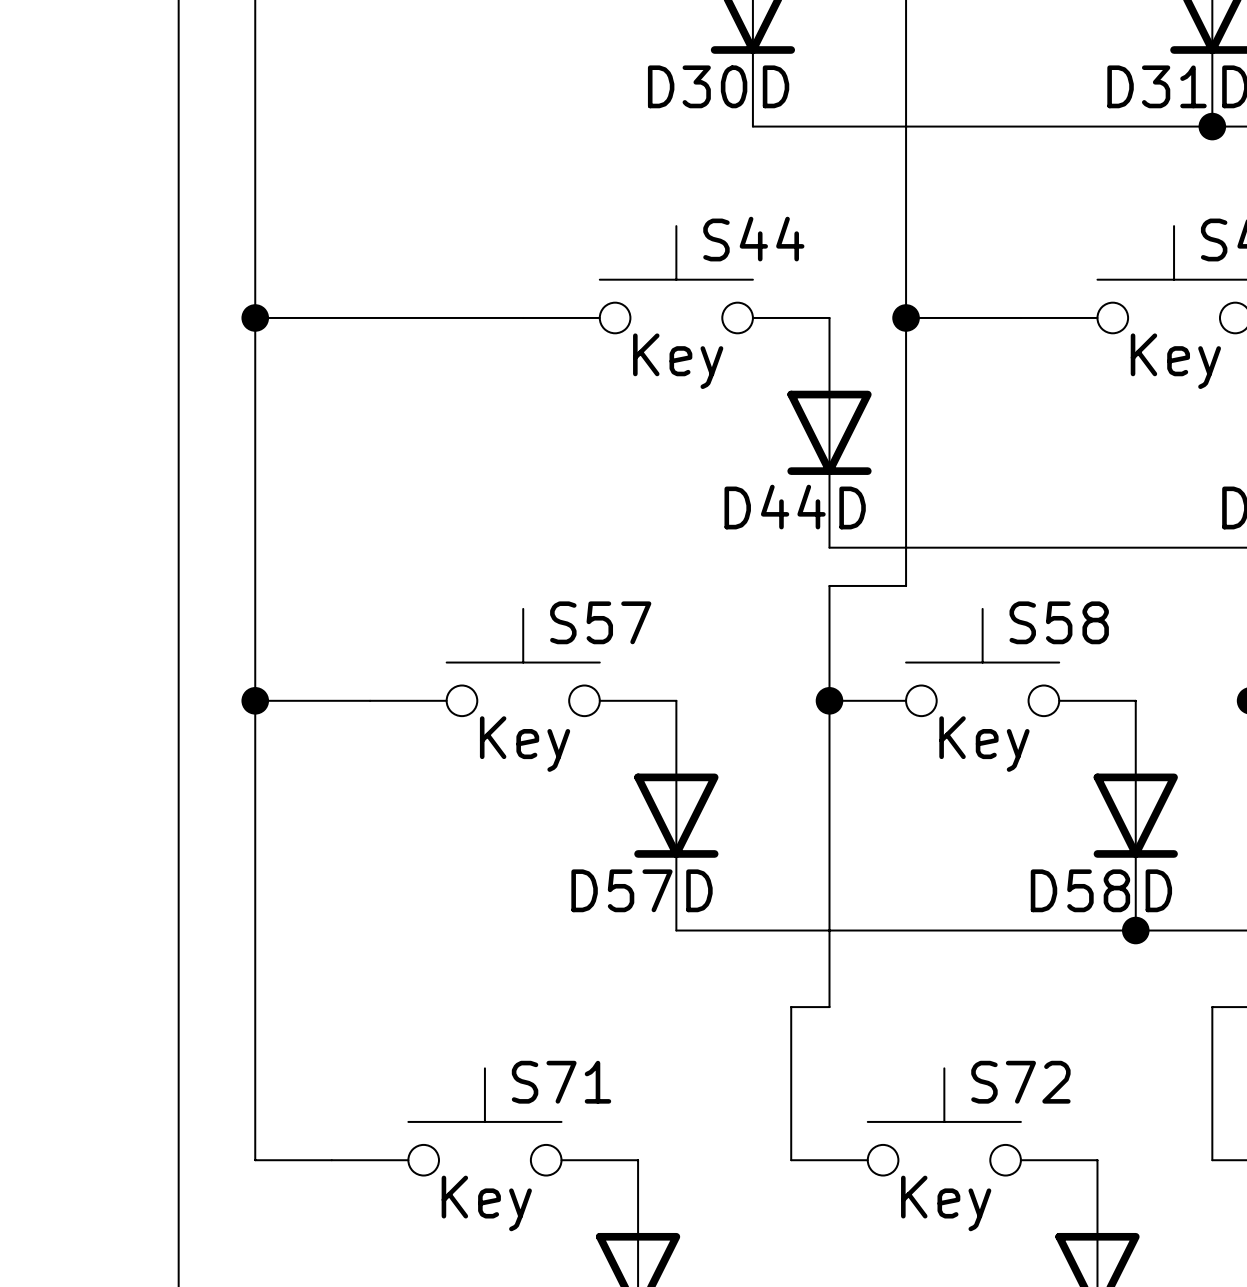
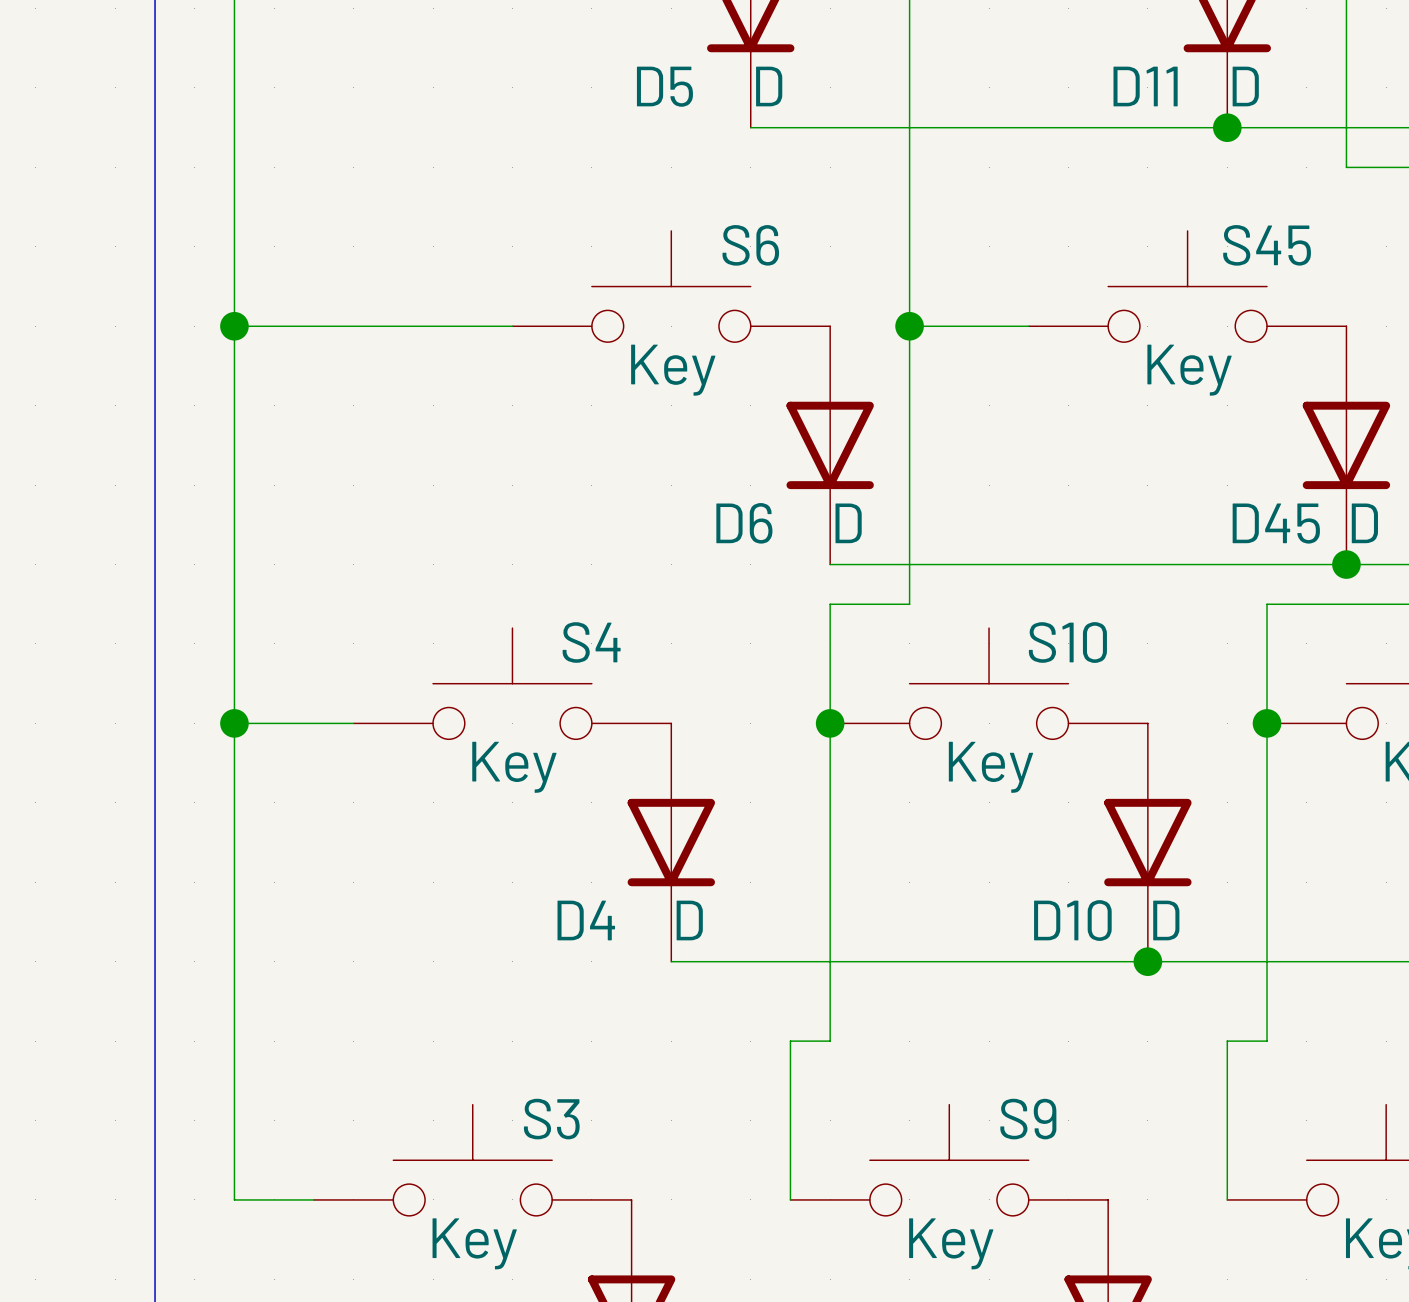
D30 name: D30 (697, 86) -> D5 (664, 86)
D31 name: D31 (1157, 86) -> D11 (1145, 86)
S44 name: S44 (753, 239) -> S6 (750, 245)
D44 name: D44 (775, 507) -> D6 (744, 523)
S57 name: S57 (600, 622) -> S4 (591, 642)
S58 name: S58 (1059, 622) -> S10 (1067, 642)
D57 name: D57 (621, 890) -> D4 (586, 920)
D58 name: D58 (1080, 890) -> D10 (1072, 920)
S71 name: S71 (561, 1082) -> S3 (551, 1119)
S72 name: S72 (1020, 1082) -> S9 (1028, 1119)

